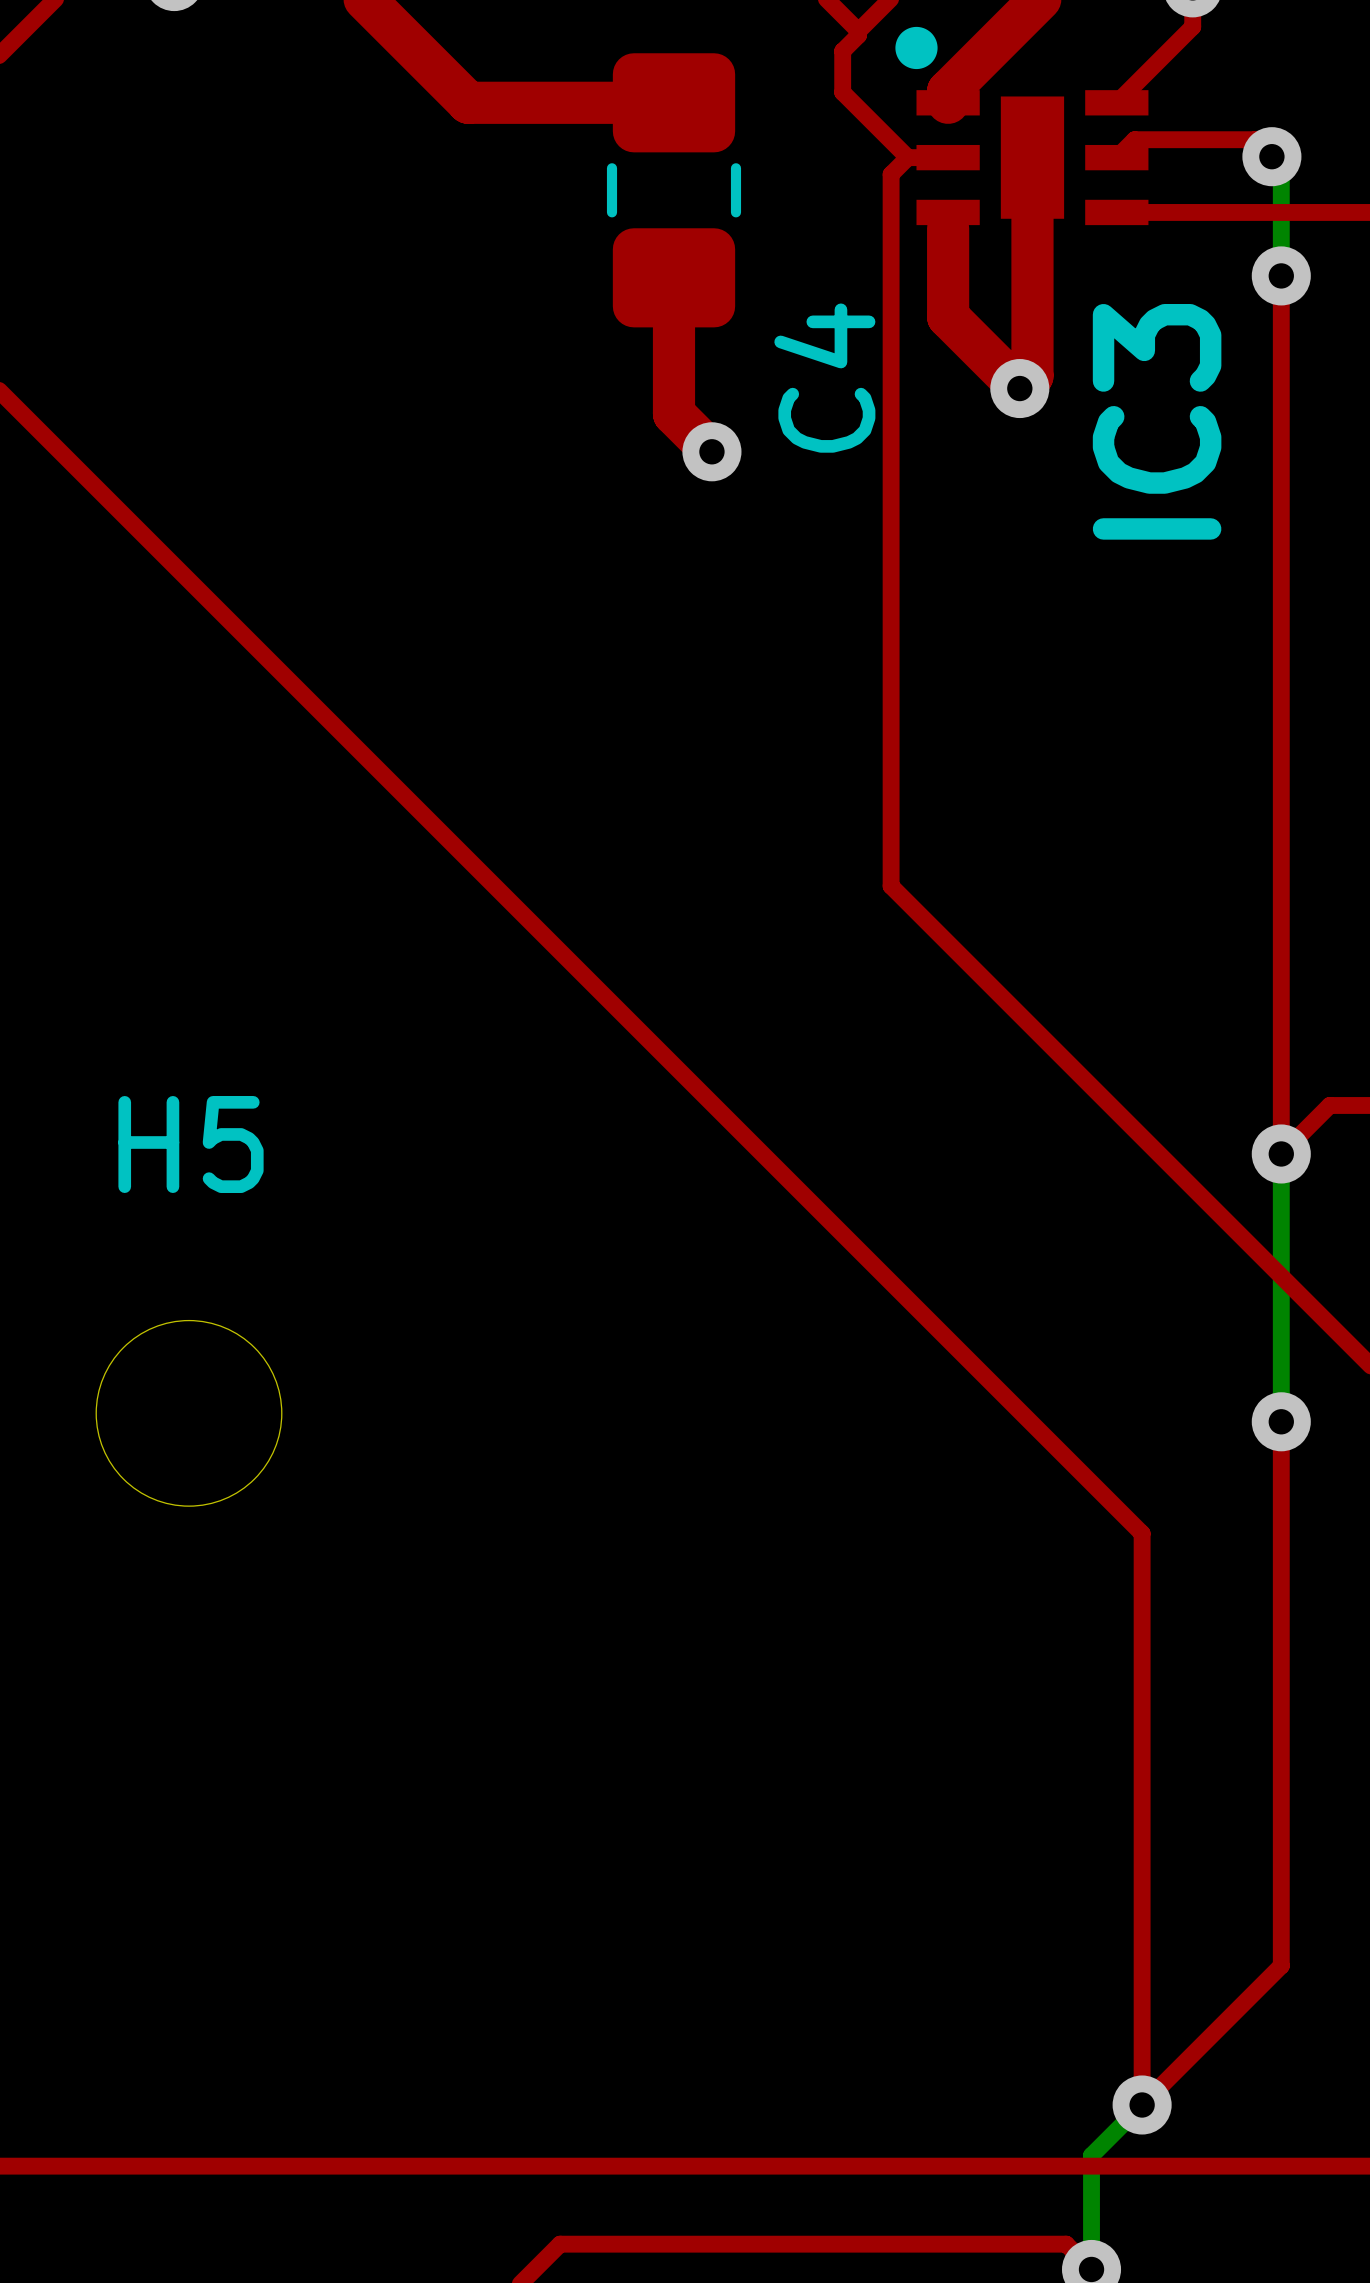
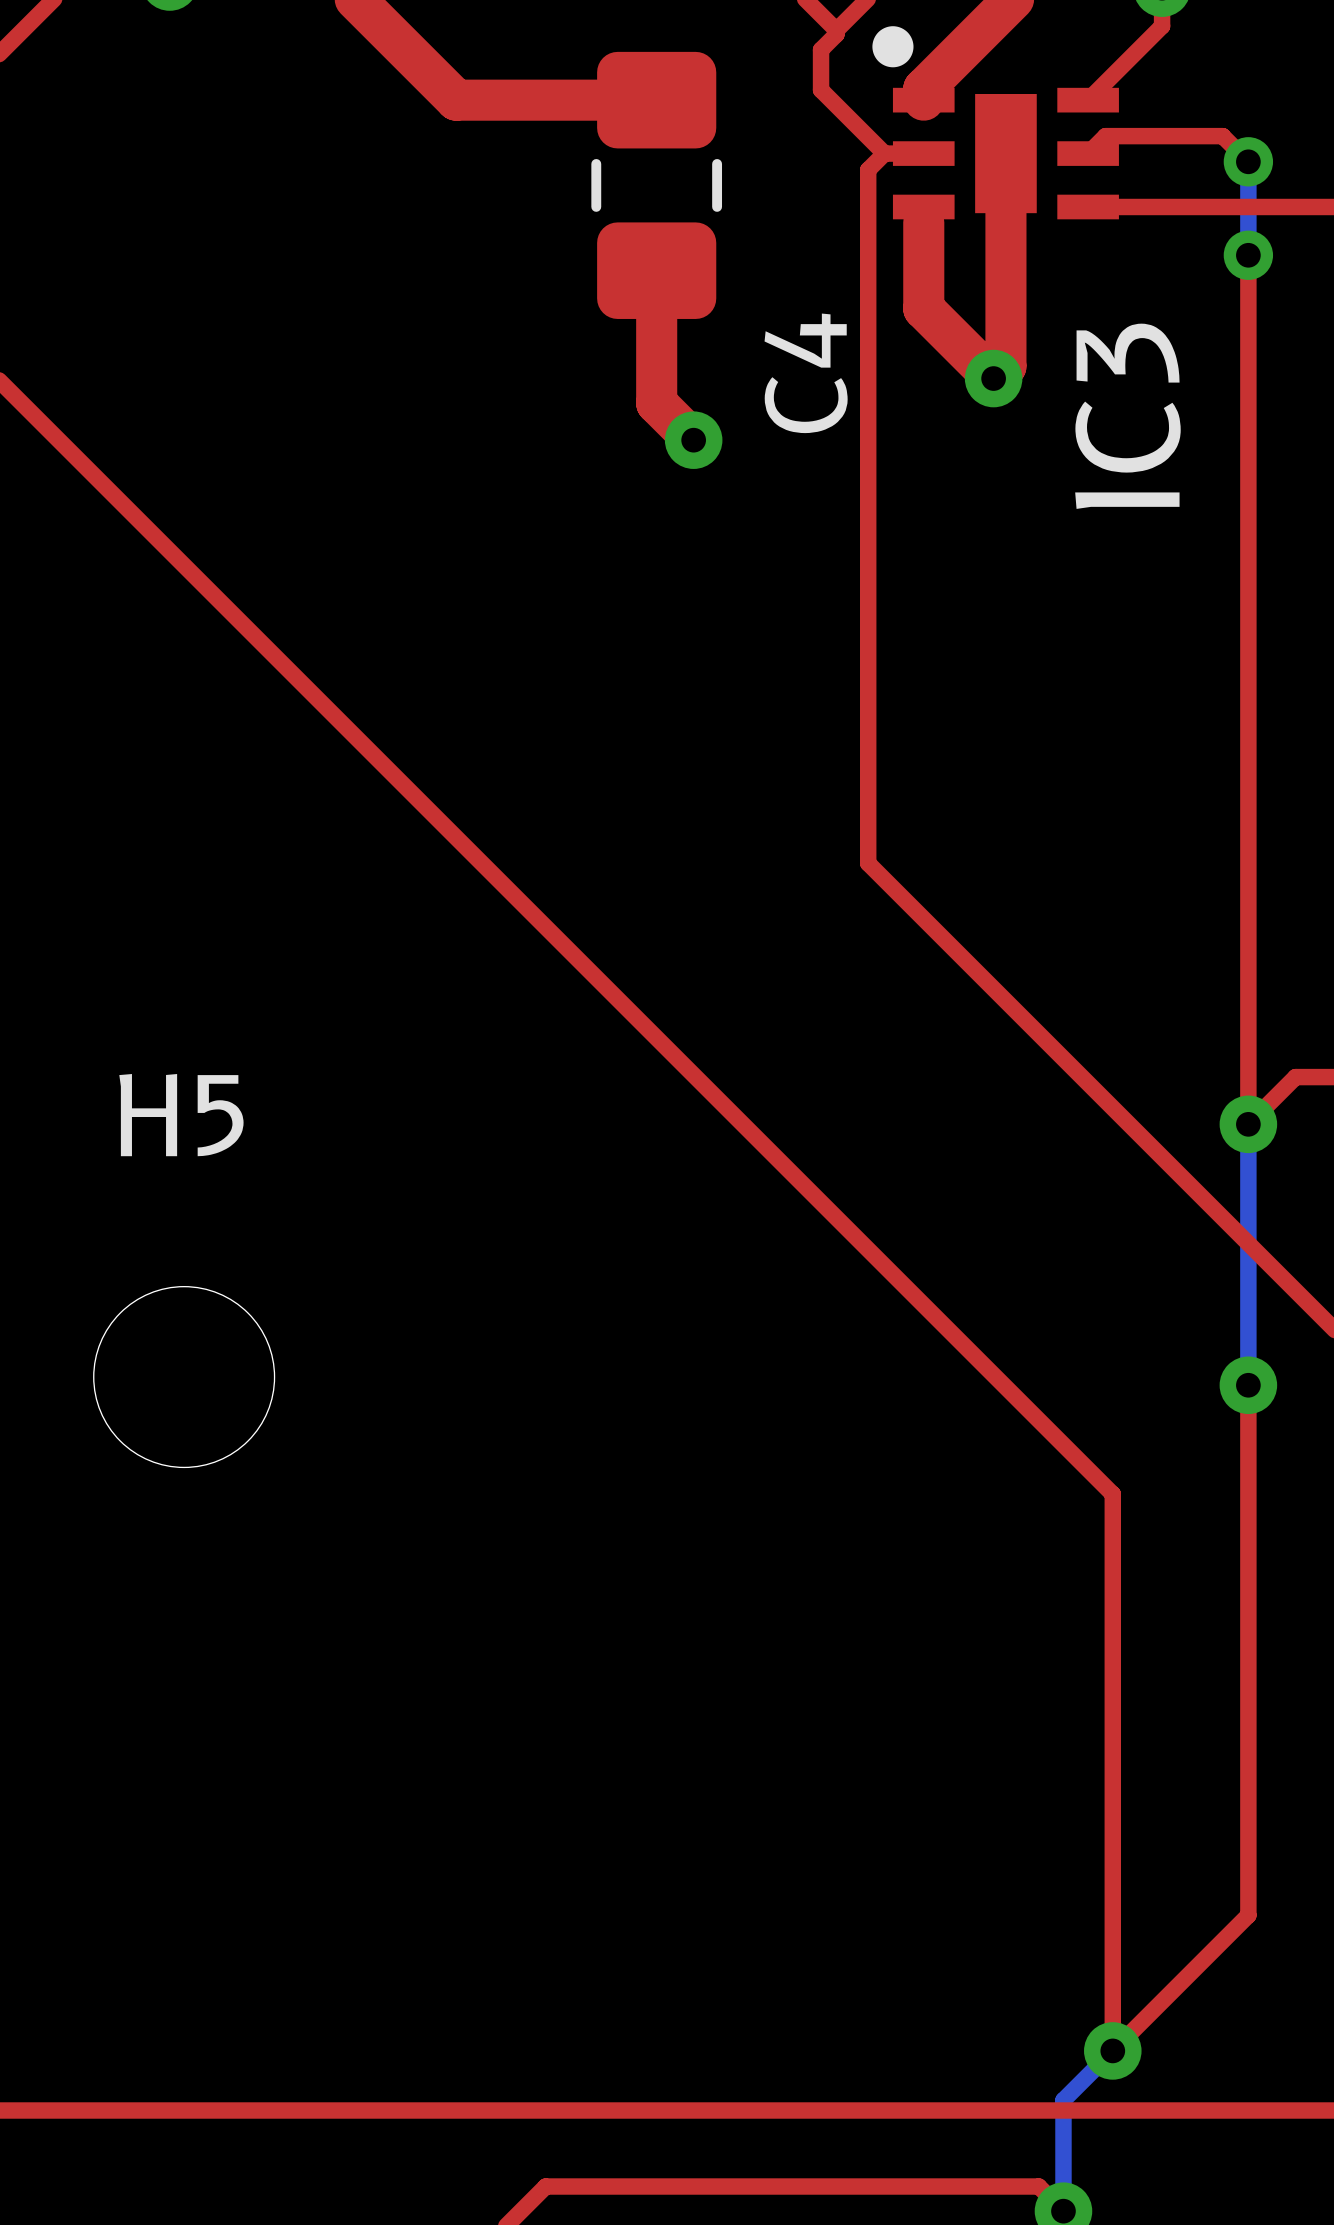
via size: [1242, 127, 1302, 187] -> [1223, 137, 1274, 187]
via size: [1251, 246, 1311, 306] -> [1223, 230, 1274, 280]

